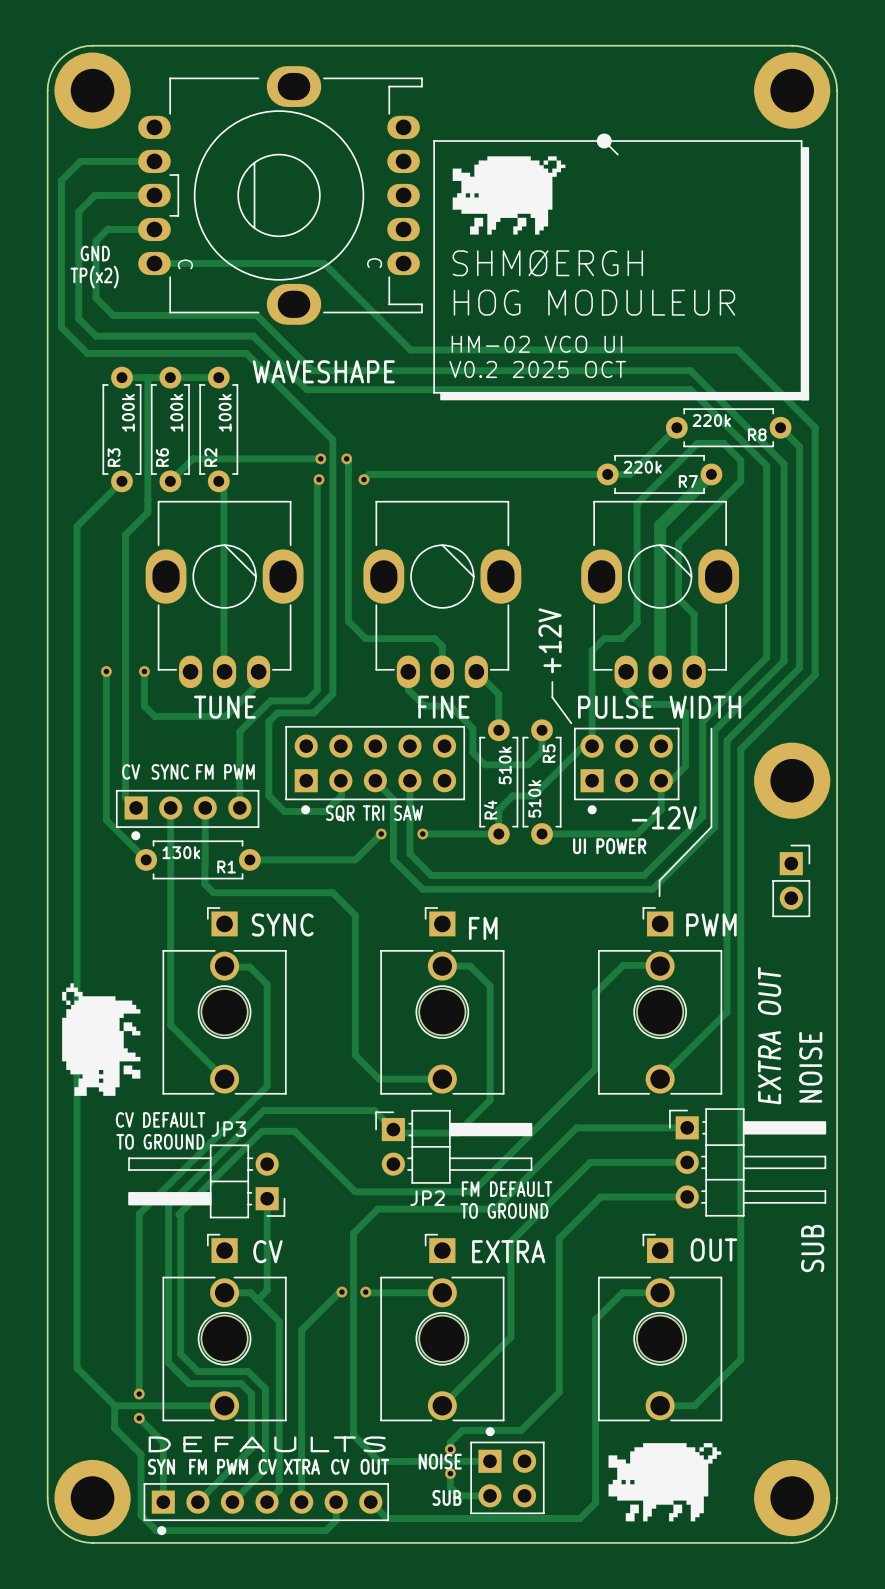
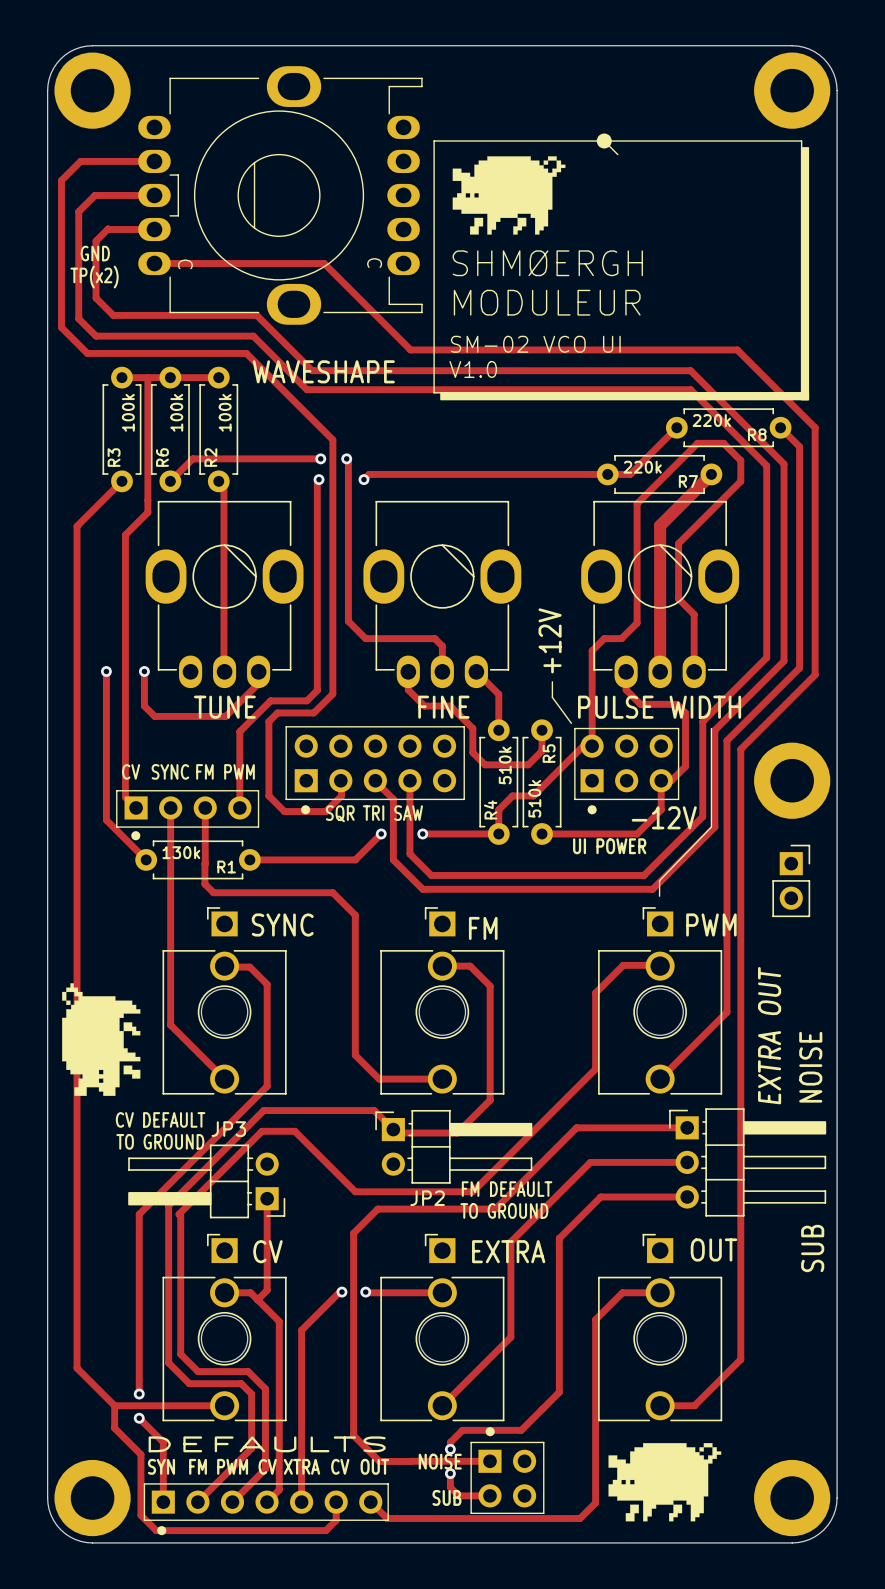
text: HOG MODULEUR (594, 302) -> MODULEUR (547, 302)
text: HM-02 VCO UI (536, 344) -> SM-02 VCO UI (535, 344)
text: V0.2 2025 OCT (537, 369) -> V1.0 (473, 369)

